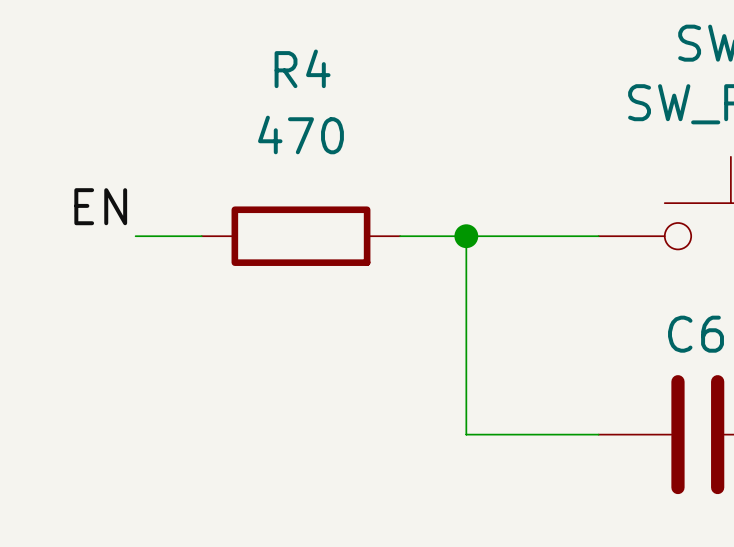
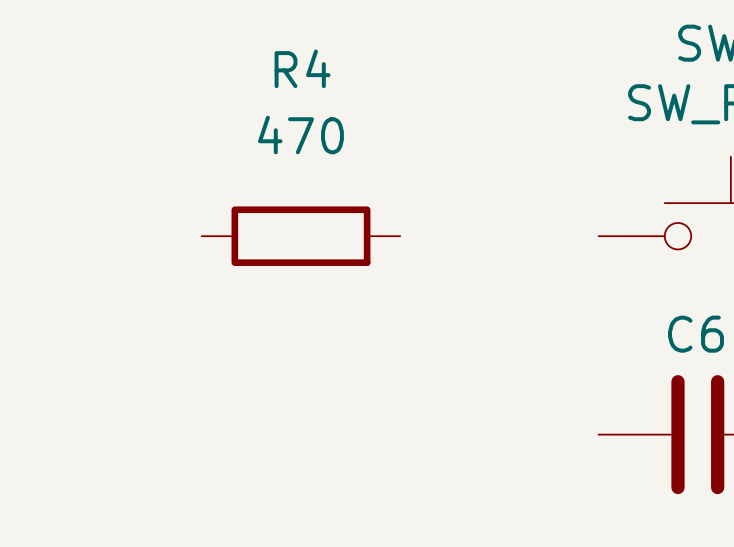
label: EN (100, 206) -> none
wire: (135, 236) (201, 236) -> none
wire: (400, 236) (598, 236) -> none
wire: (466, 236) (466, 434) (598, 434) -> none
junction: (466, 236) -> none

